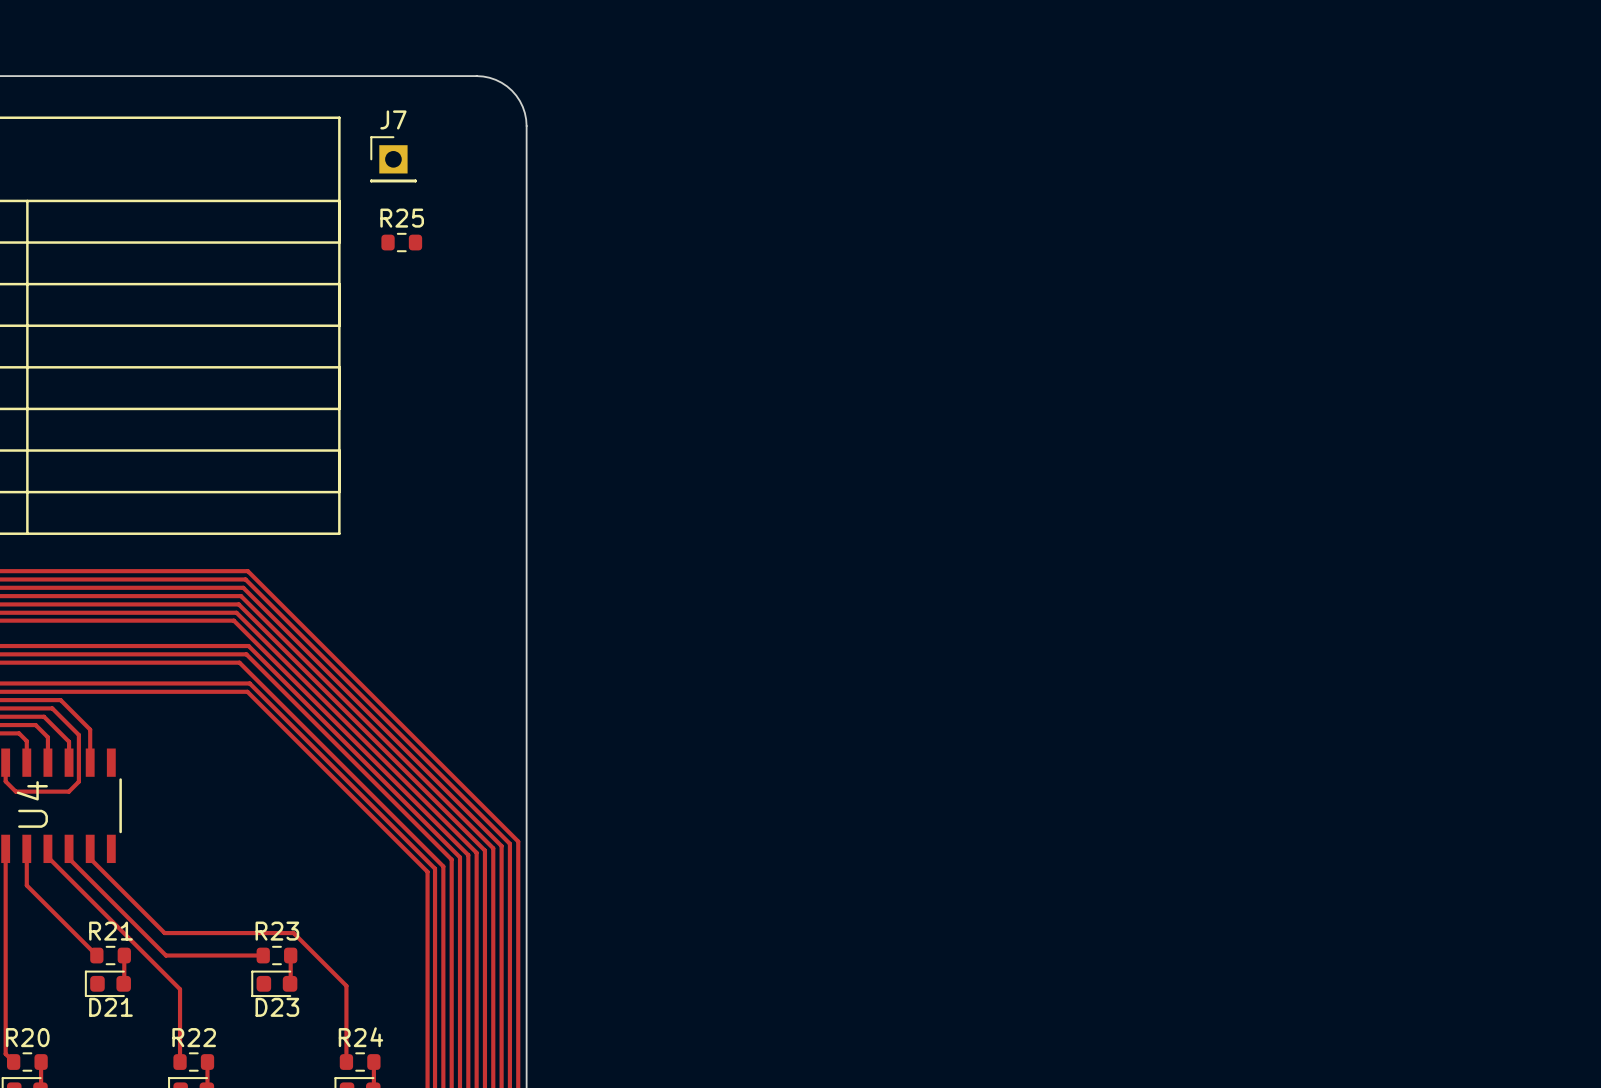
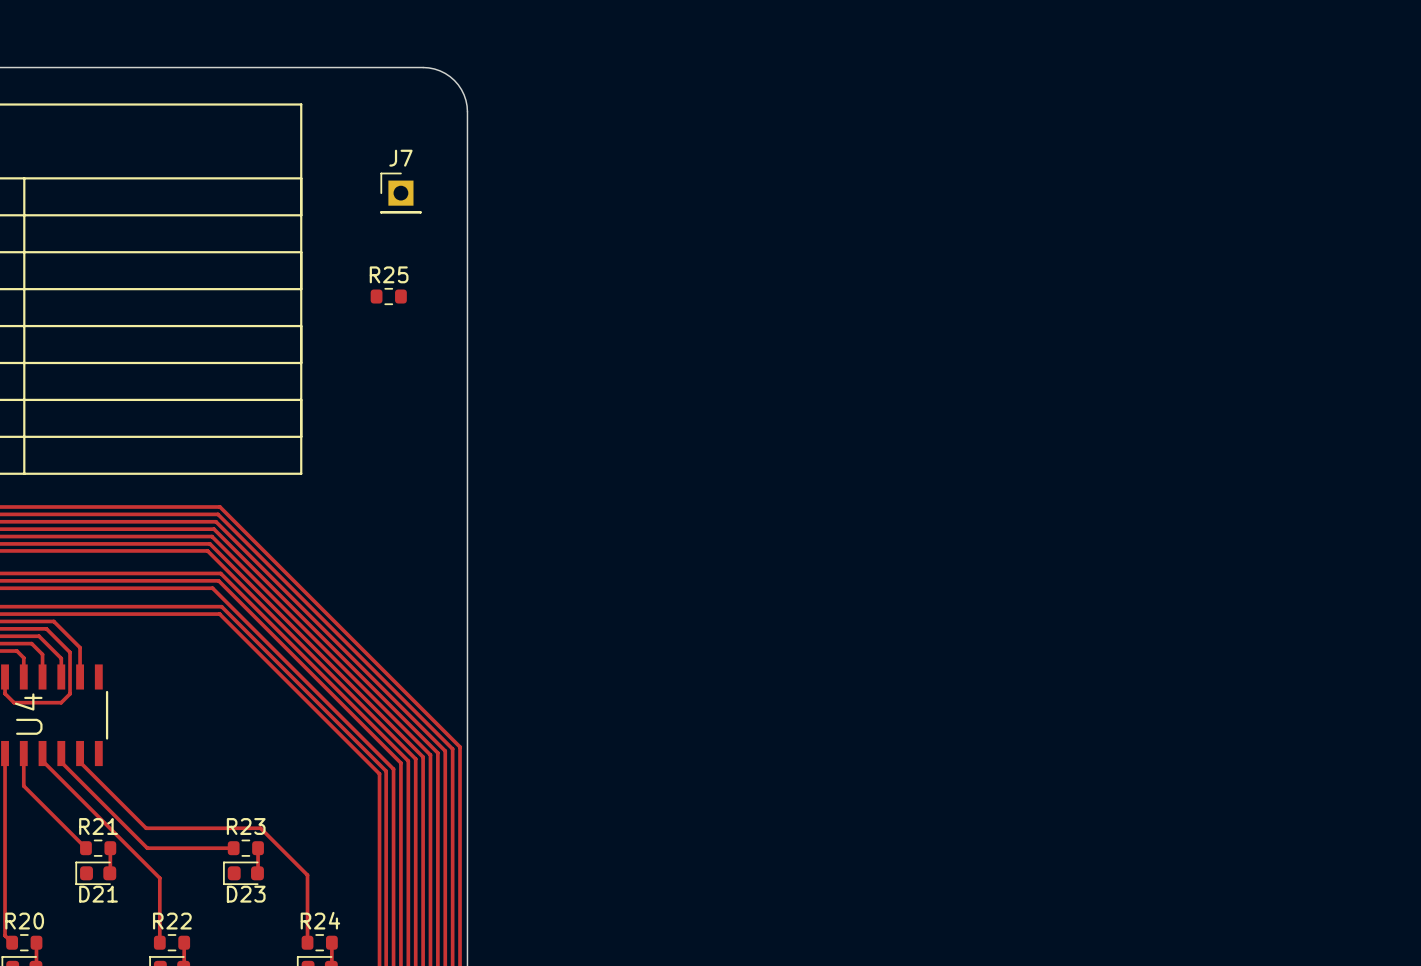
J7 position: (393, 159) -> (400, 193)
R25 position: (401, 242) -> (388, 296)

